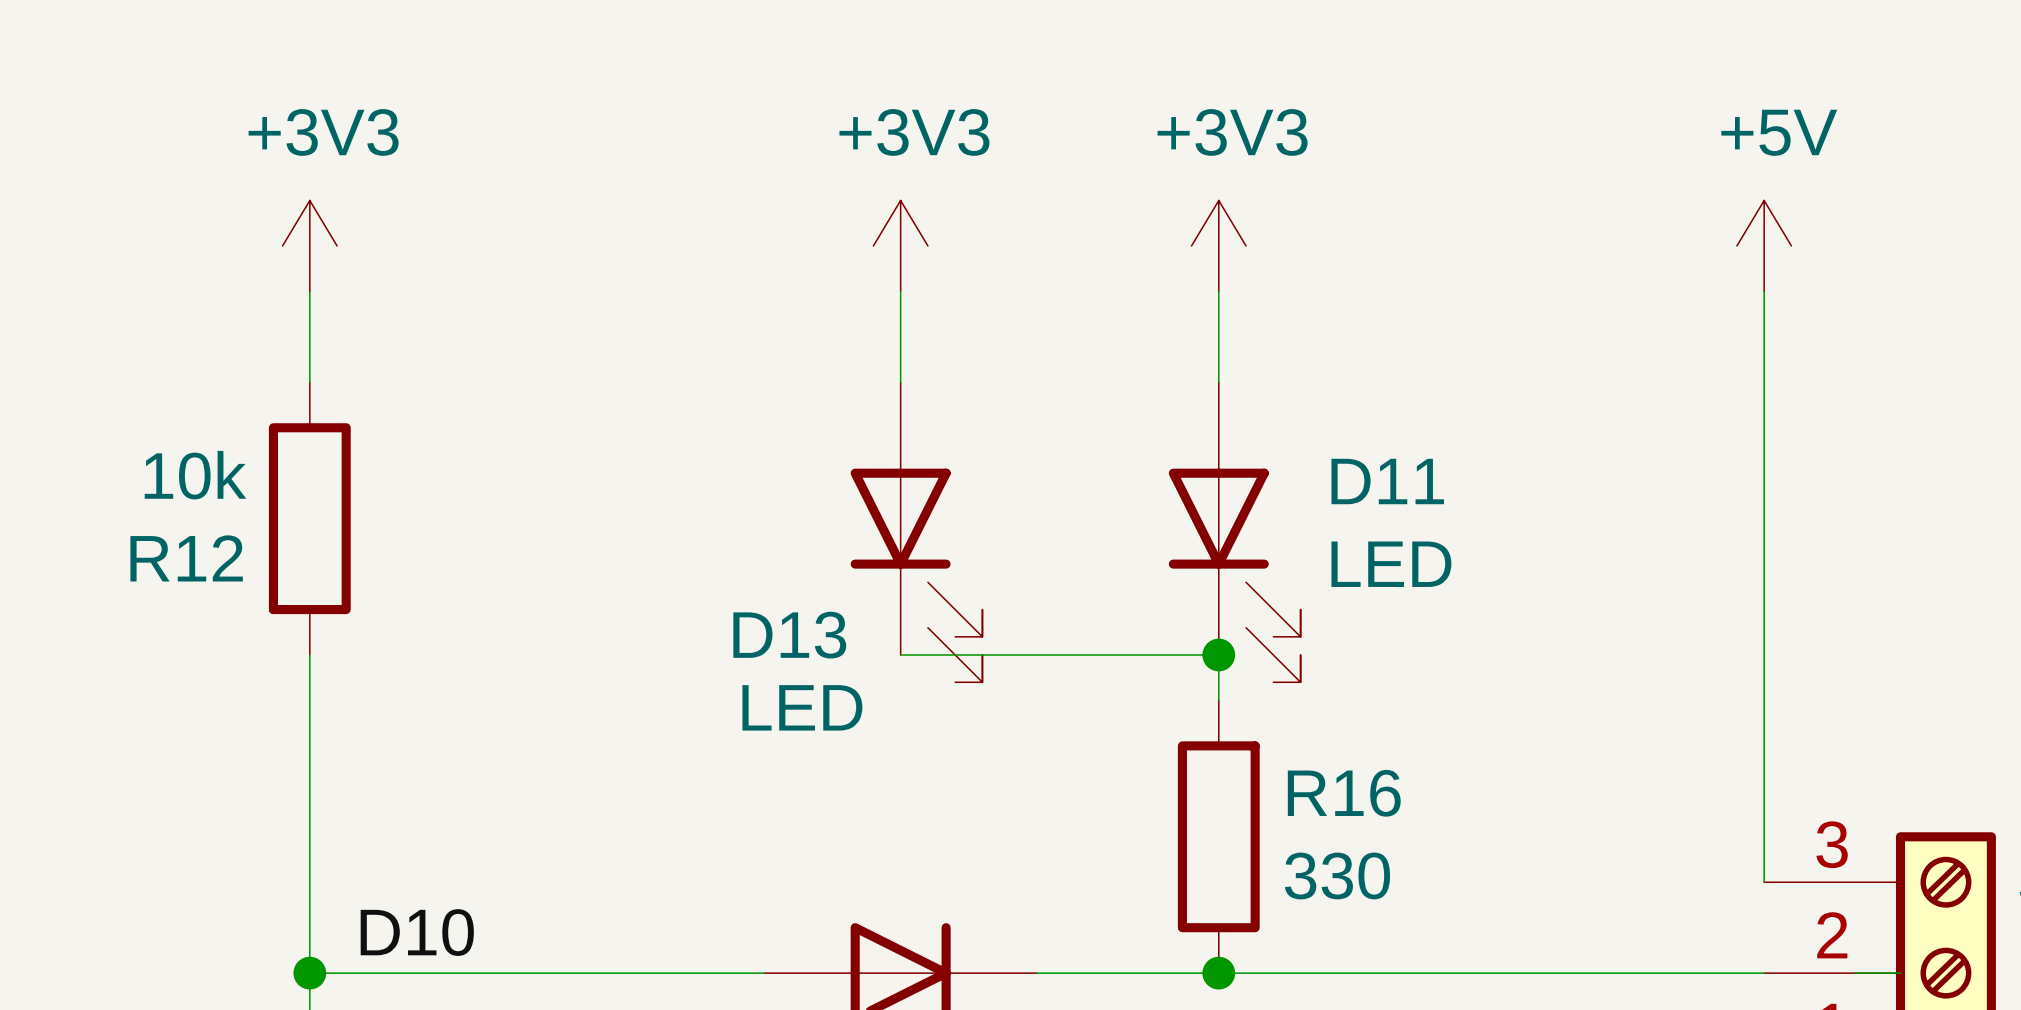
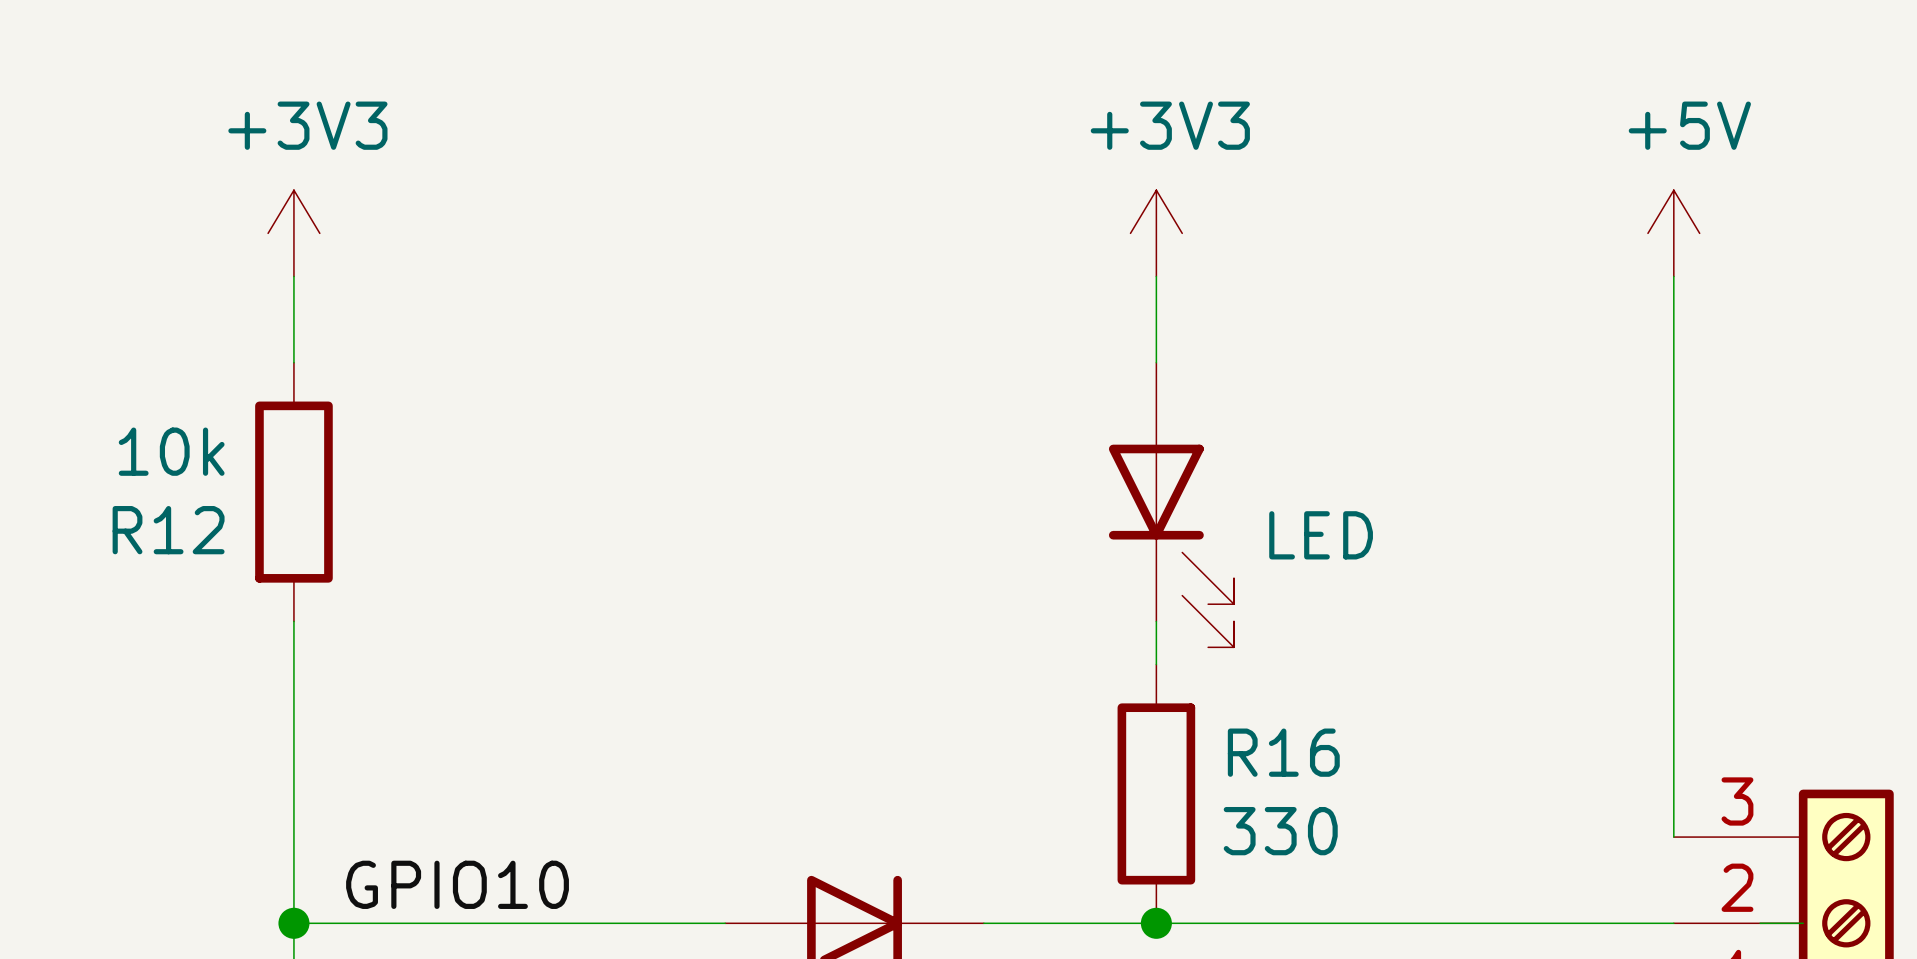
power symbol: +3V3 (900, 245) -> none
wire: (900, 291) (900, 382) -> none
D11 name: D11 (1387, 481) -> none
D13: LED (916, 532) -> none
wire: (900, 655) (1218, 655) -> none
junction: (1218, 655) -> none
label: D10 (417, 932) -> GPIO10 (457, 884)

